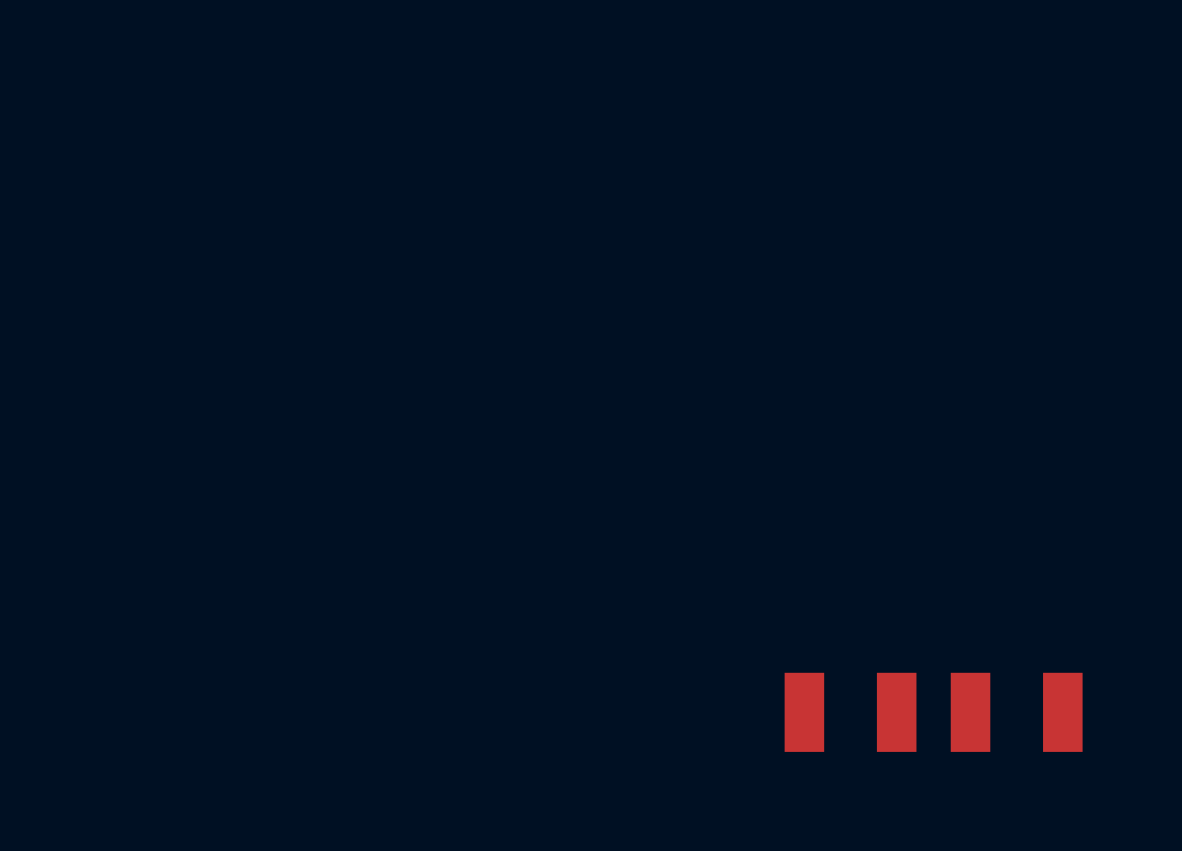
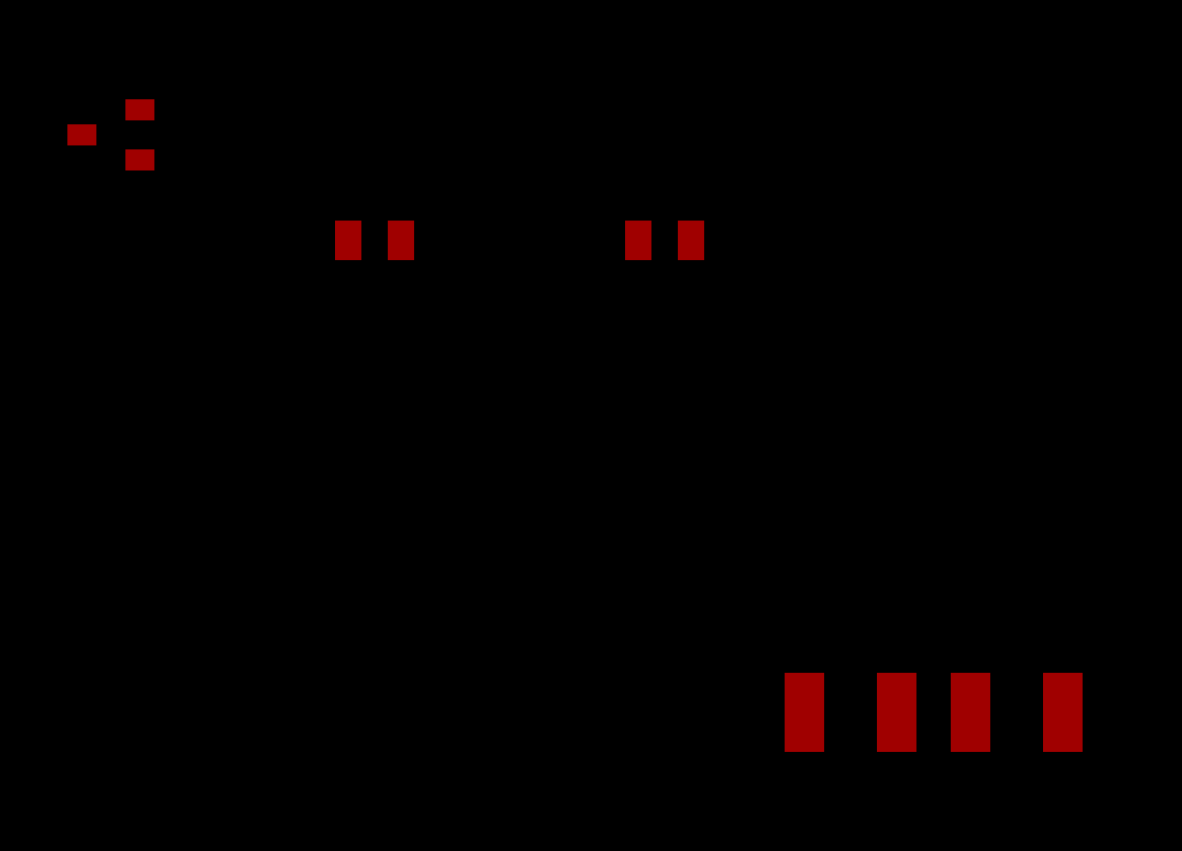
part: none -> (110, 134)
part: none -> (374, 240)
part: none -> (664, 240)

